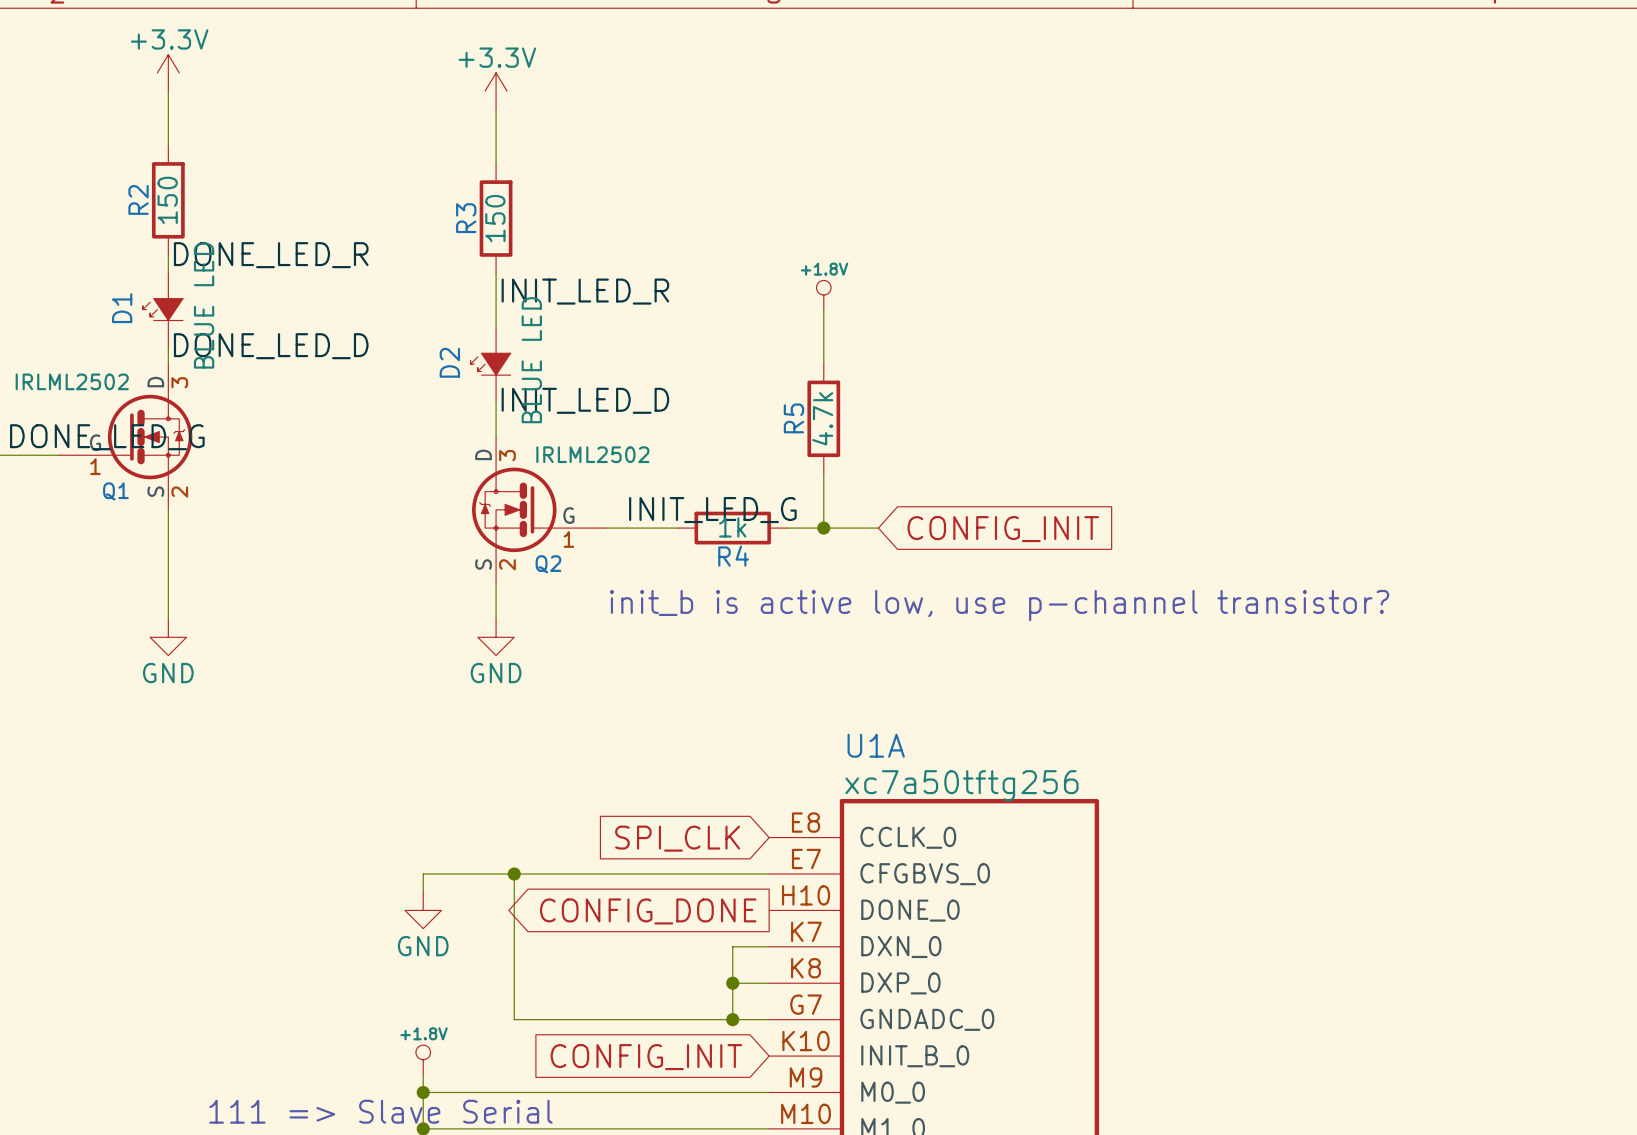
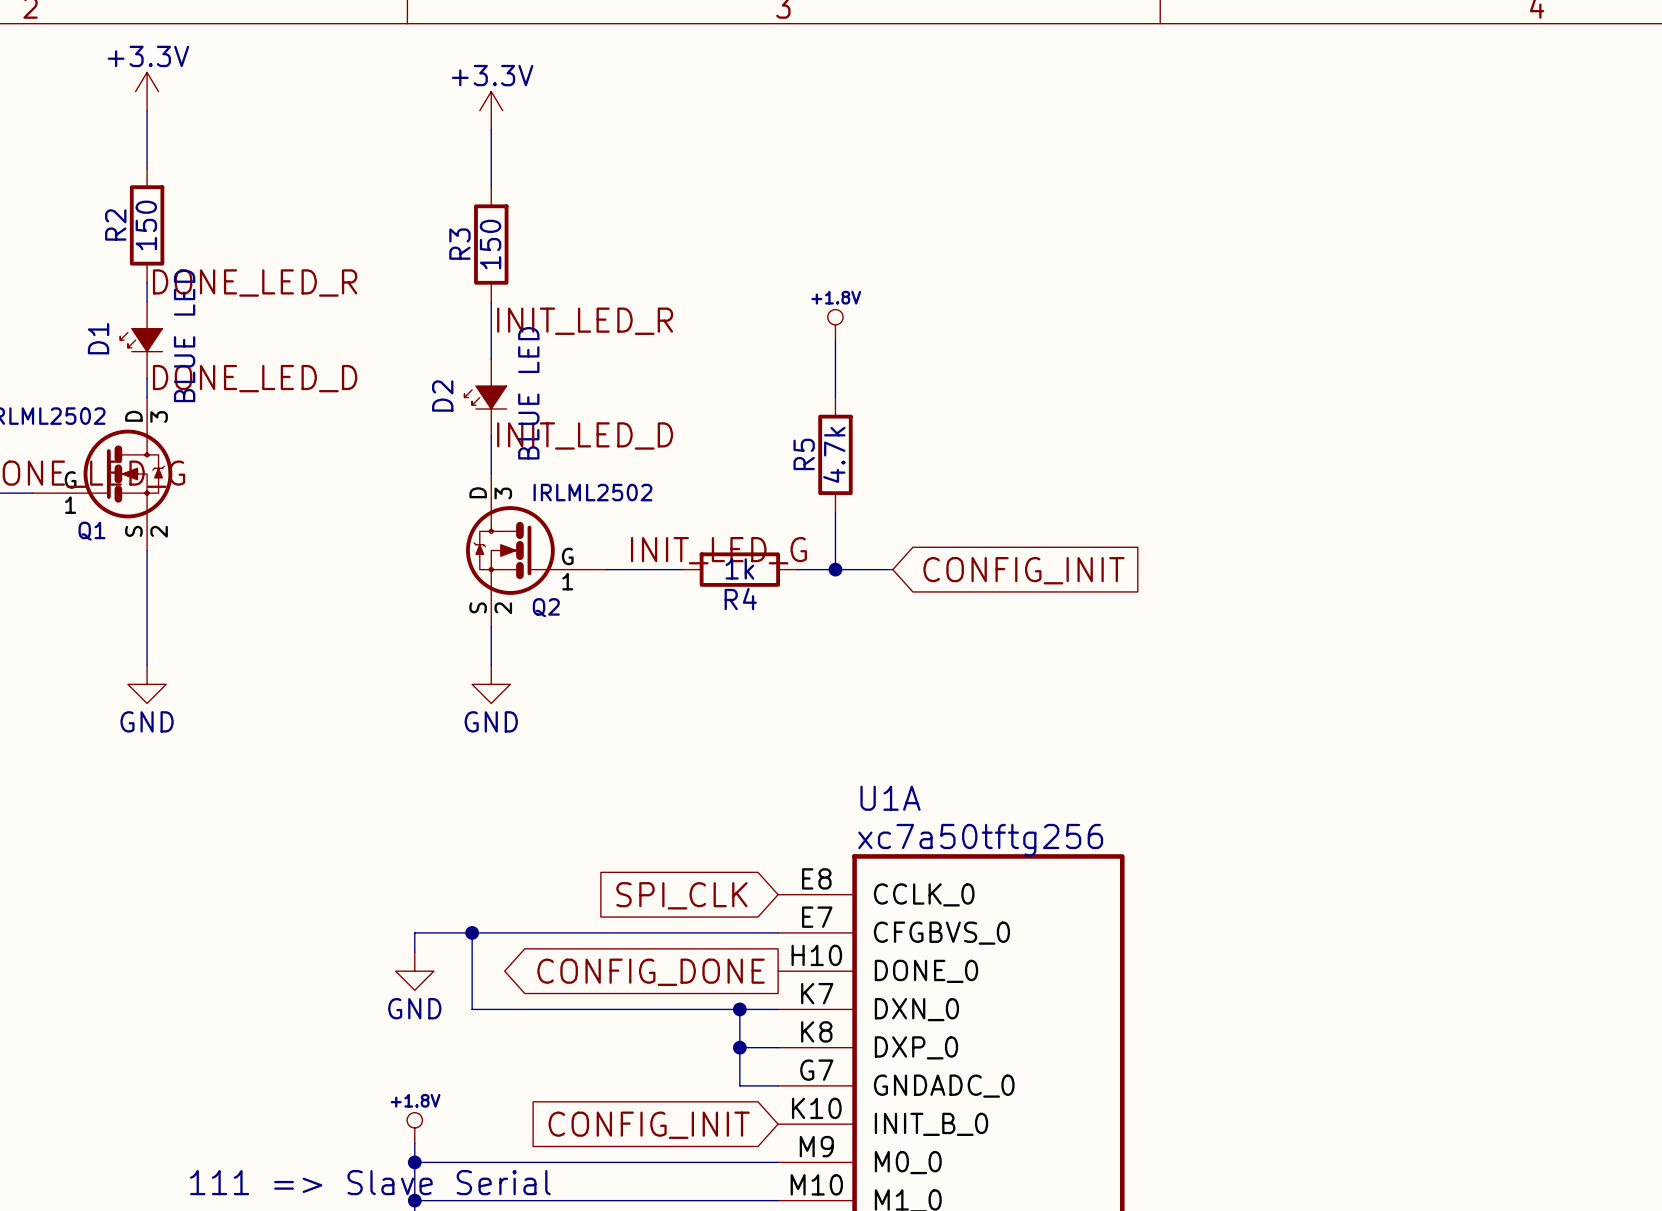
text: init_b is active low, use p-channel transistor? (999, 605) -> none
wire: none -> (472, 932) (472, 1009) (739, 1009)
wire: (514, 874) (514, 1019) (732, 1019) -> none
junction position: (514, 874) -> (472, 932)
junction position: (732, 1019) -> (739, 1009)

